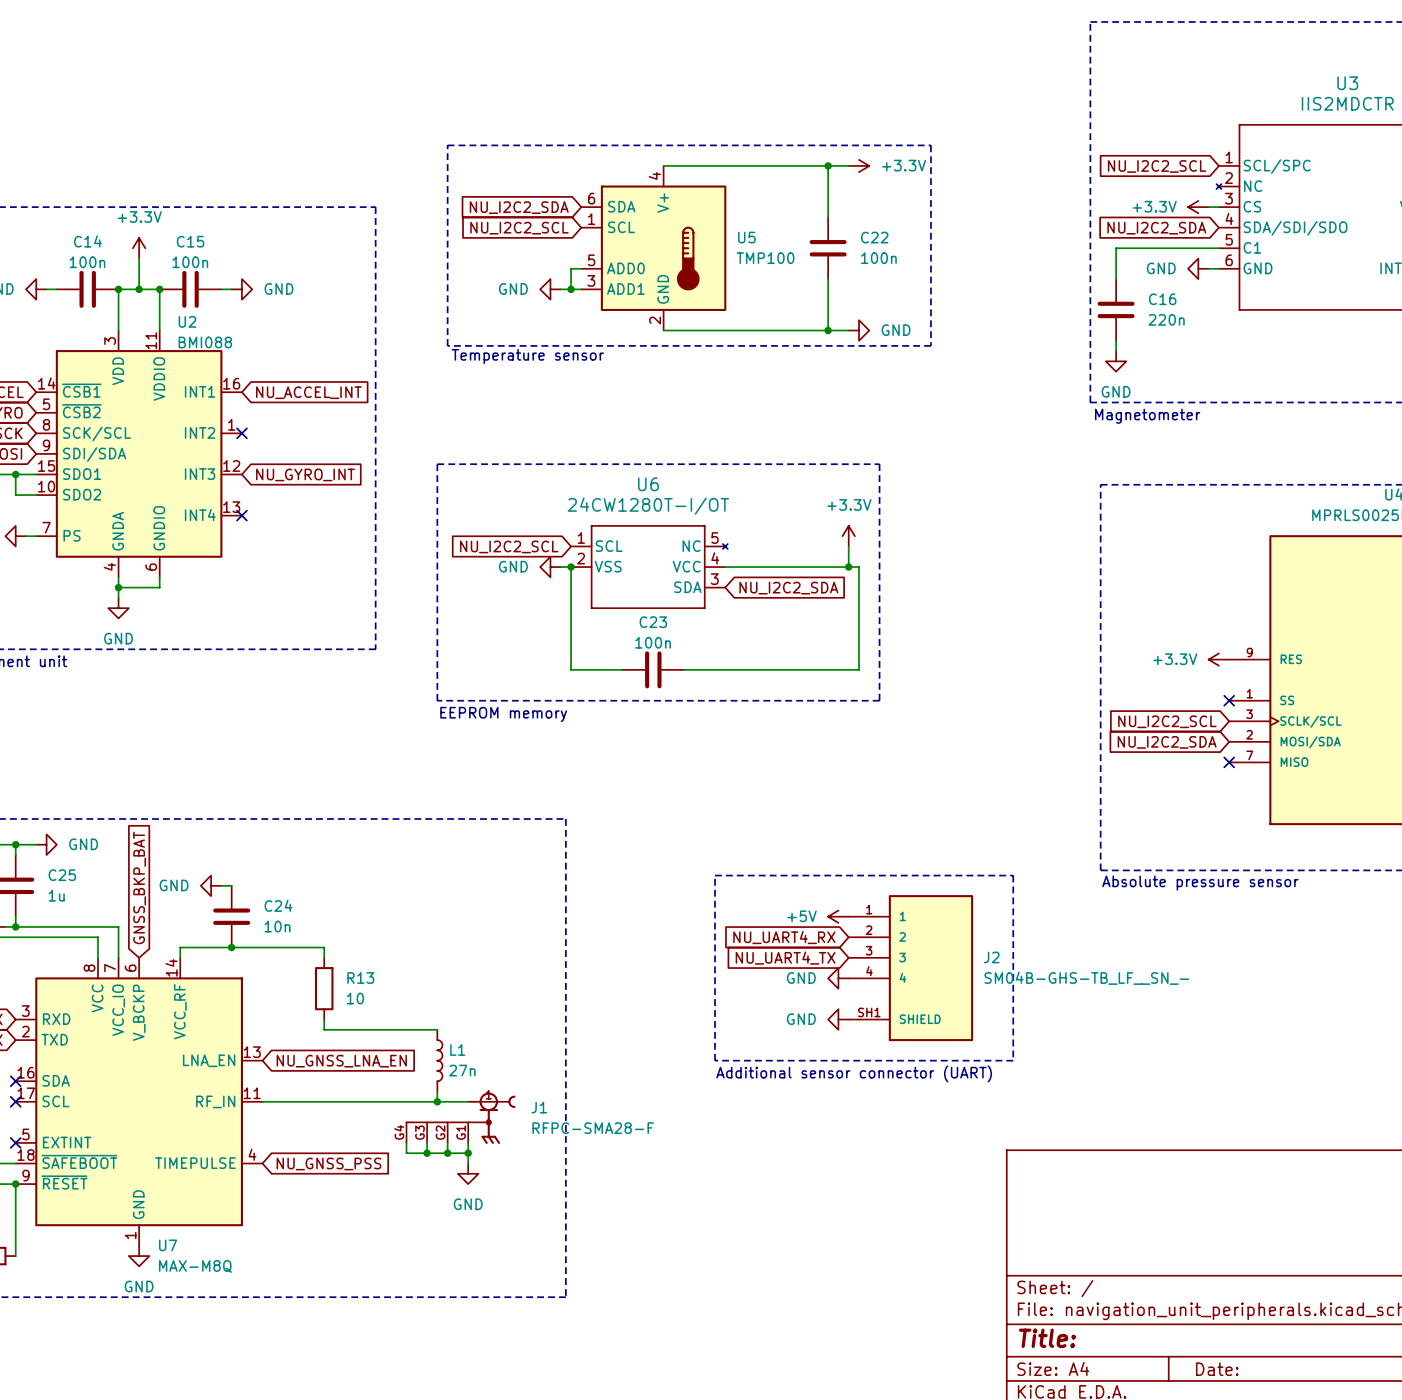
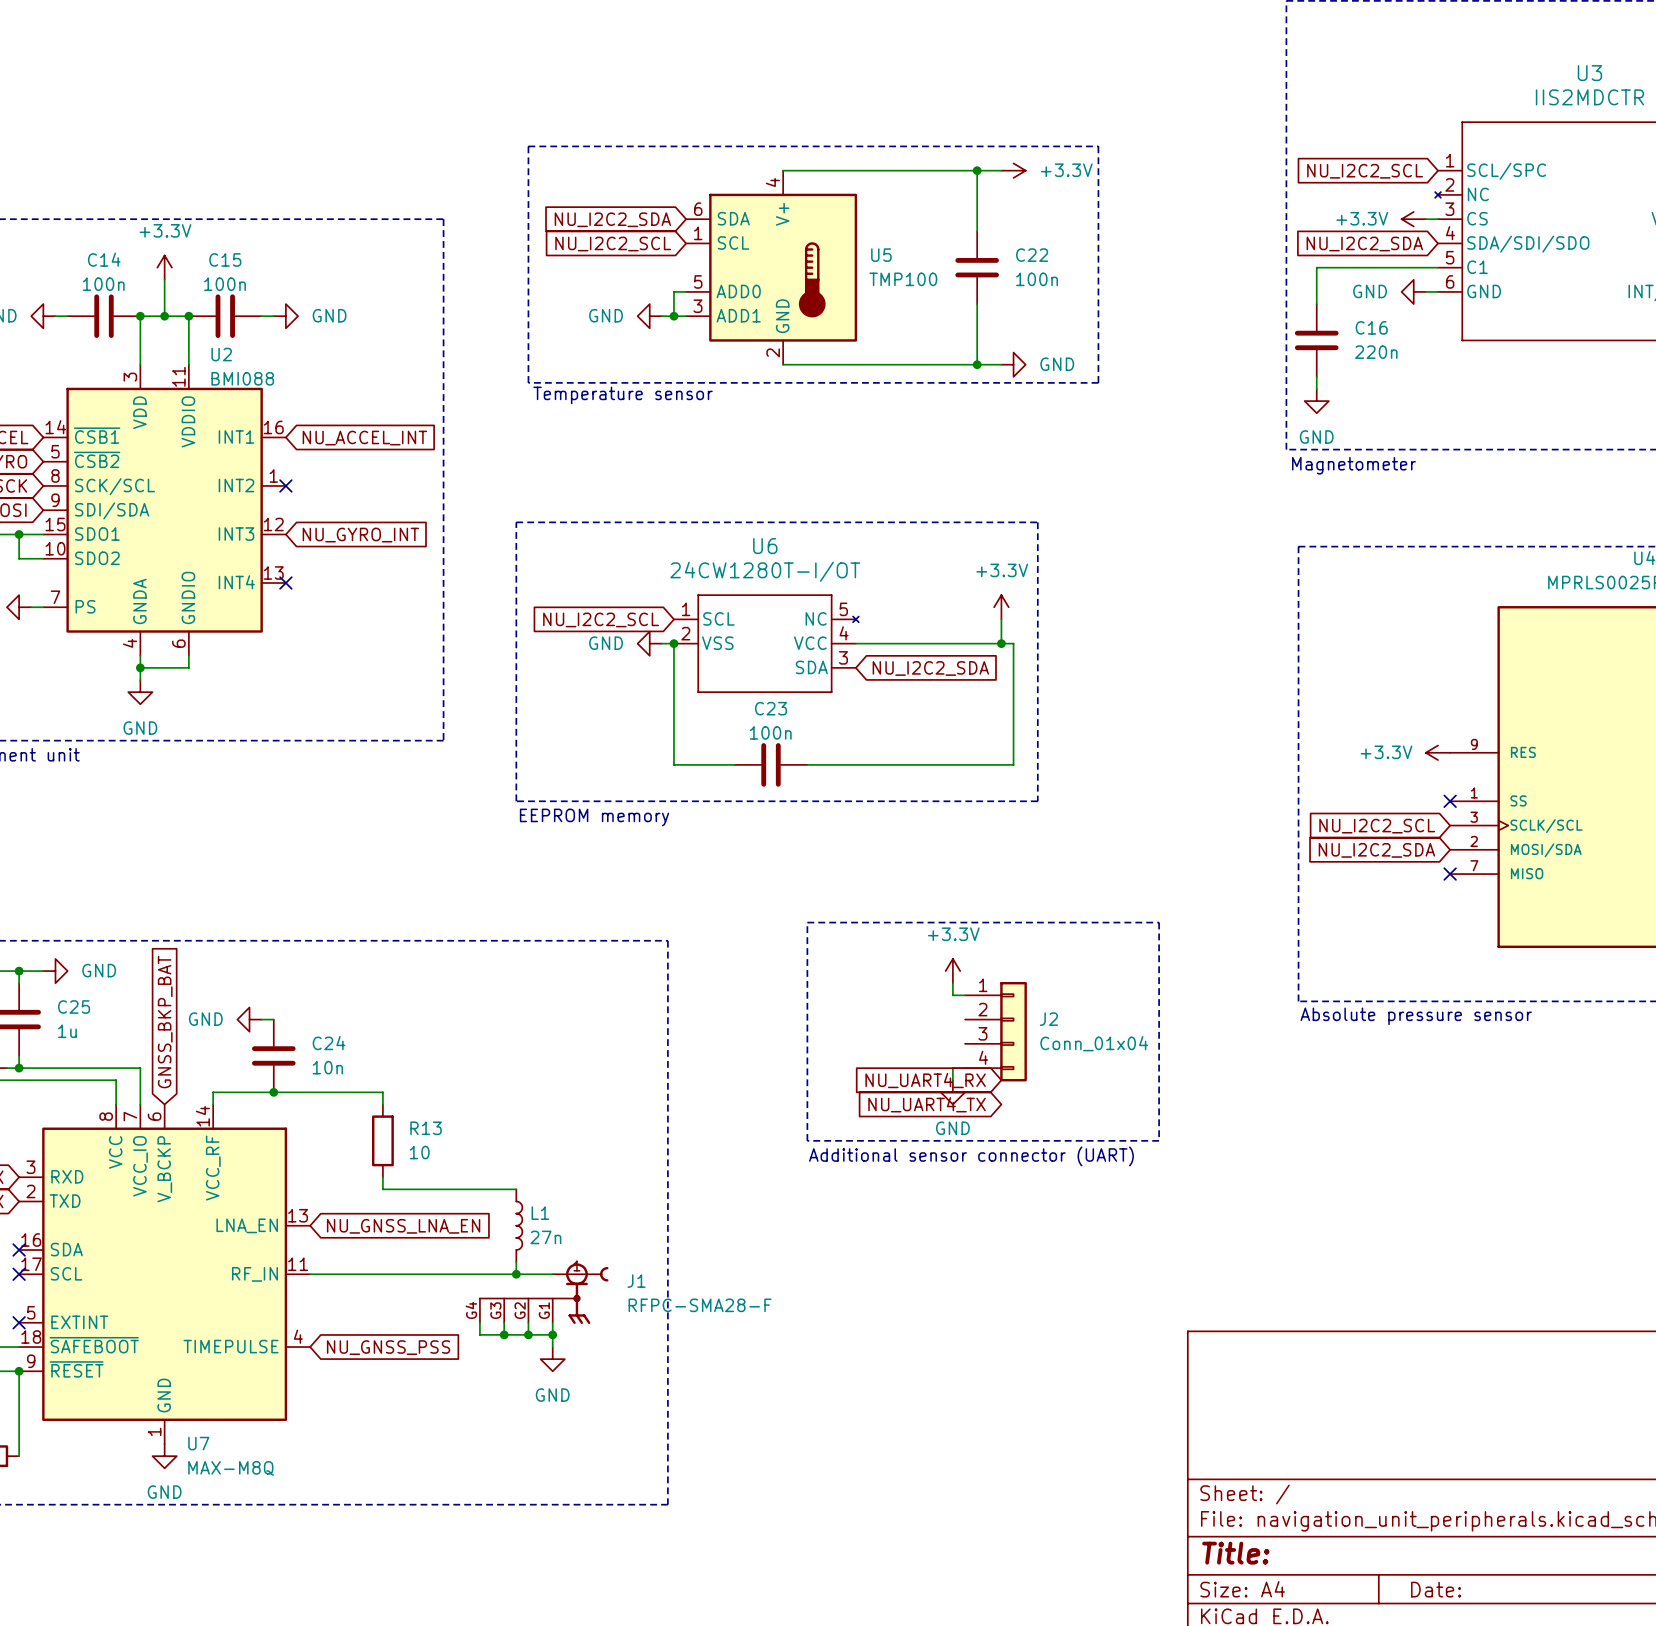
power symbol: none -> +3.3V (952, 971)
wire: none -> (952, 983) (952, 995) (965, 995)
line: (715, 875) (1013, 875) (1013, 1060) (715, 1060) (715, 875) -> (807, 922) (1159, 922) (1159, 1140) (807, 1140) (807, 922)
J2 symbol: [848, 895, 974, 1042] -> [965, 981, 1027, 1082]
power symbol: +5V (838, 916) -> none
wire: none -> (965, 1068) (952, 1068) (952, 1080)
power symbol: none -> GND (952, 1092)
J2 name position: J2 (991, 957) -> J2 (1048, 1019)
power symbol: GND (838, 978) -> none
J2 value: SM04B-GHS-TB_LF__SN_- (1086, 978) -> Conn_01x04 (1094, 1043)
power symbol: GND (838, 1019) -> none
text position: Additional sensor connector (UART) (854, 1073) -> Additional sensor connector (UART) (971, 1156)

